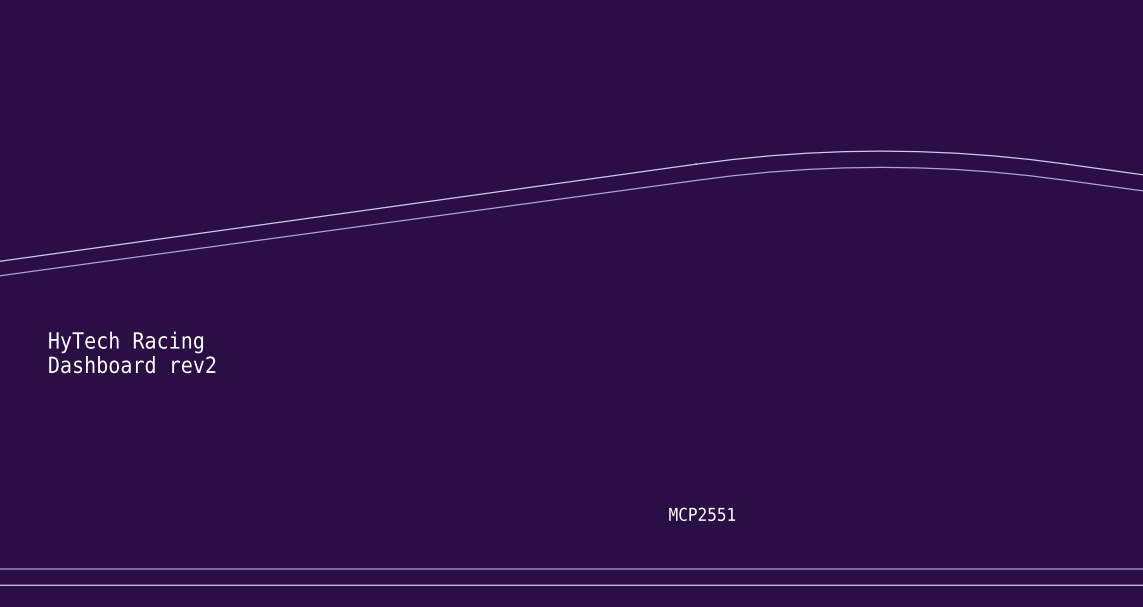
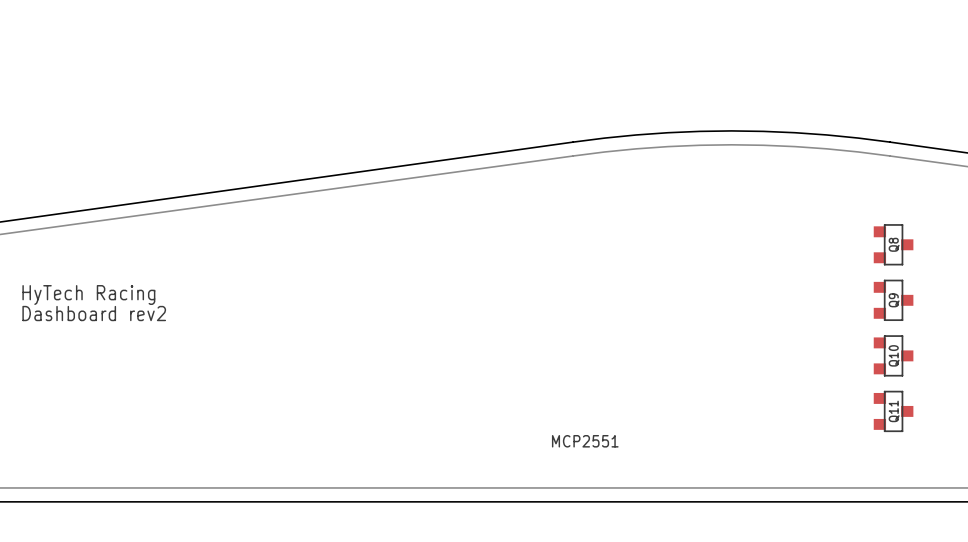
Q8: none -> (893, 244)
Q9: none -> (893, 300)
Q10: none -> (893, 355)
Q11: none -> (893, 411)

